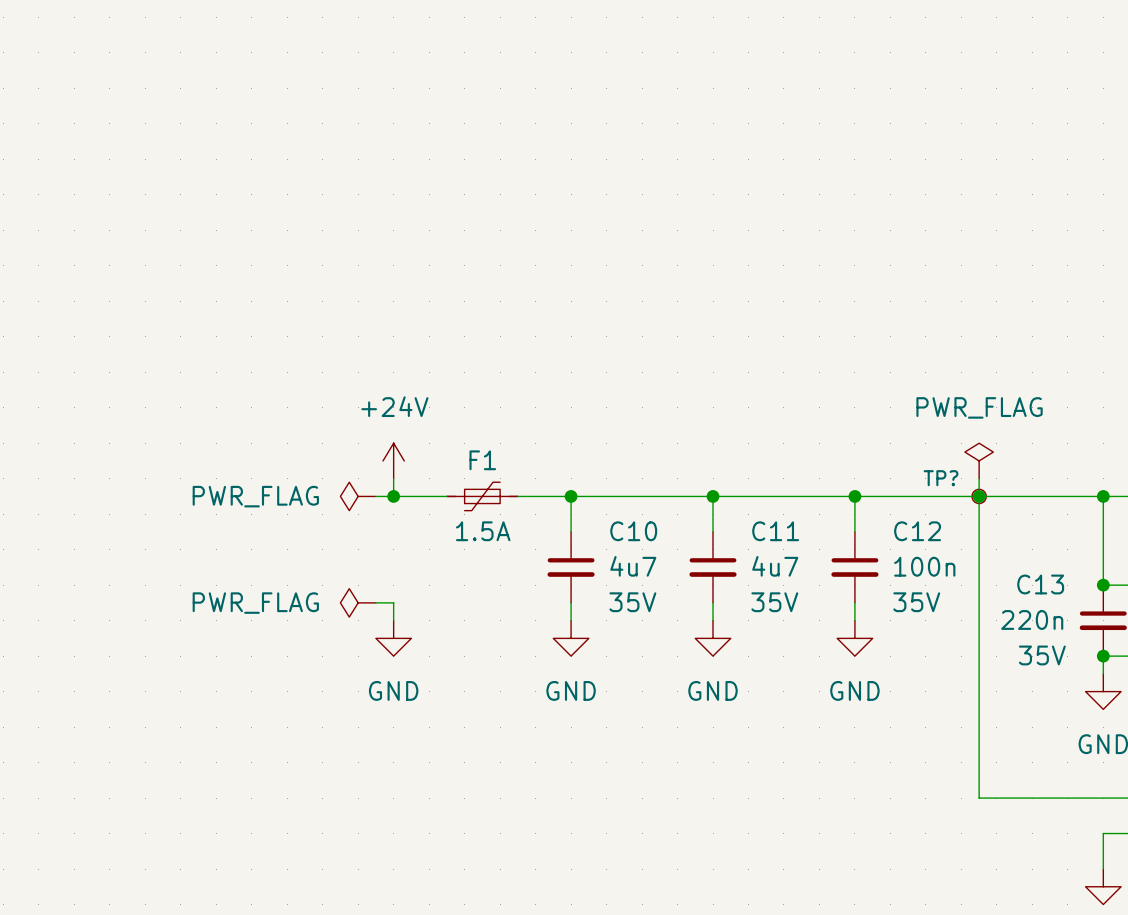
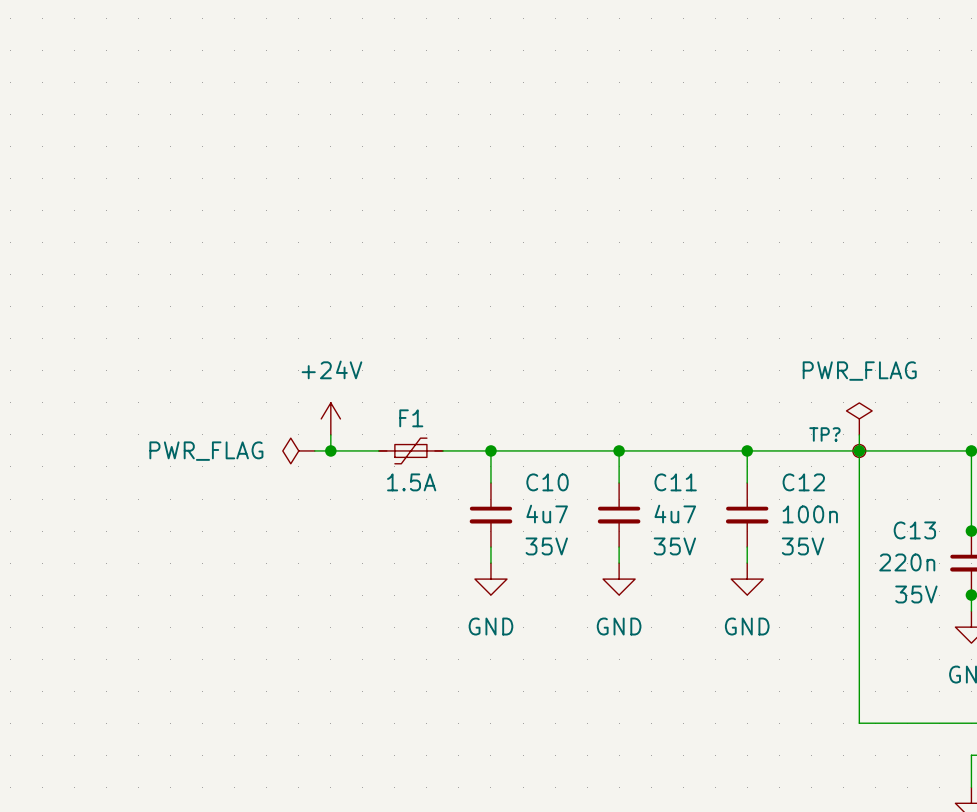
power symbol: PWR_FLAG (358, 602) -> none
wire: (375, 602) (393, 602) (393, 620) -> none
power symbol: GND (393, 638) -> none

